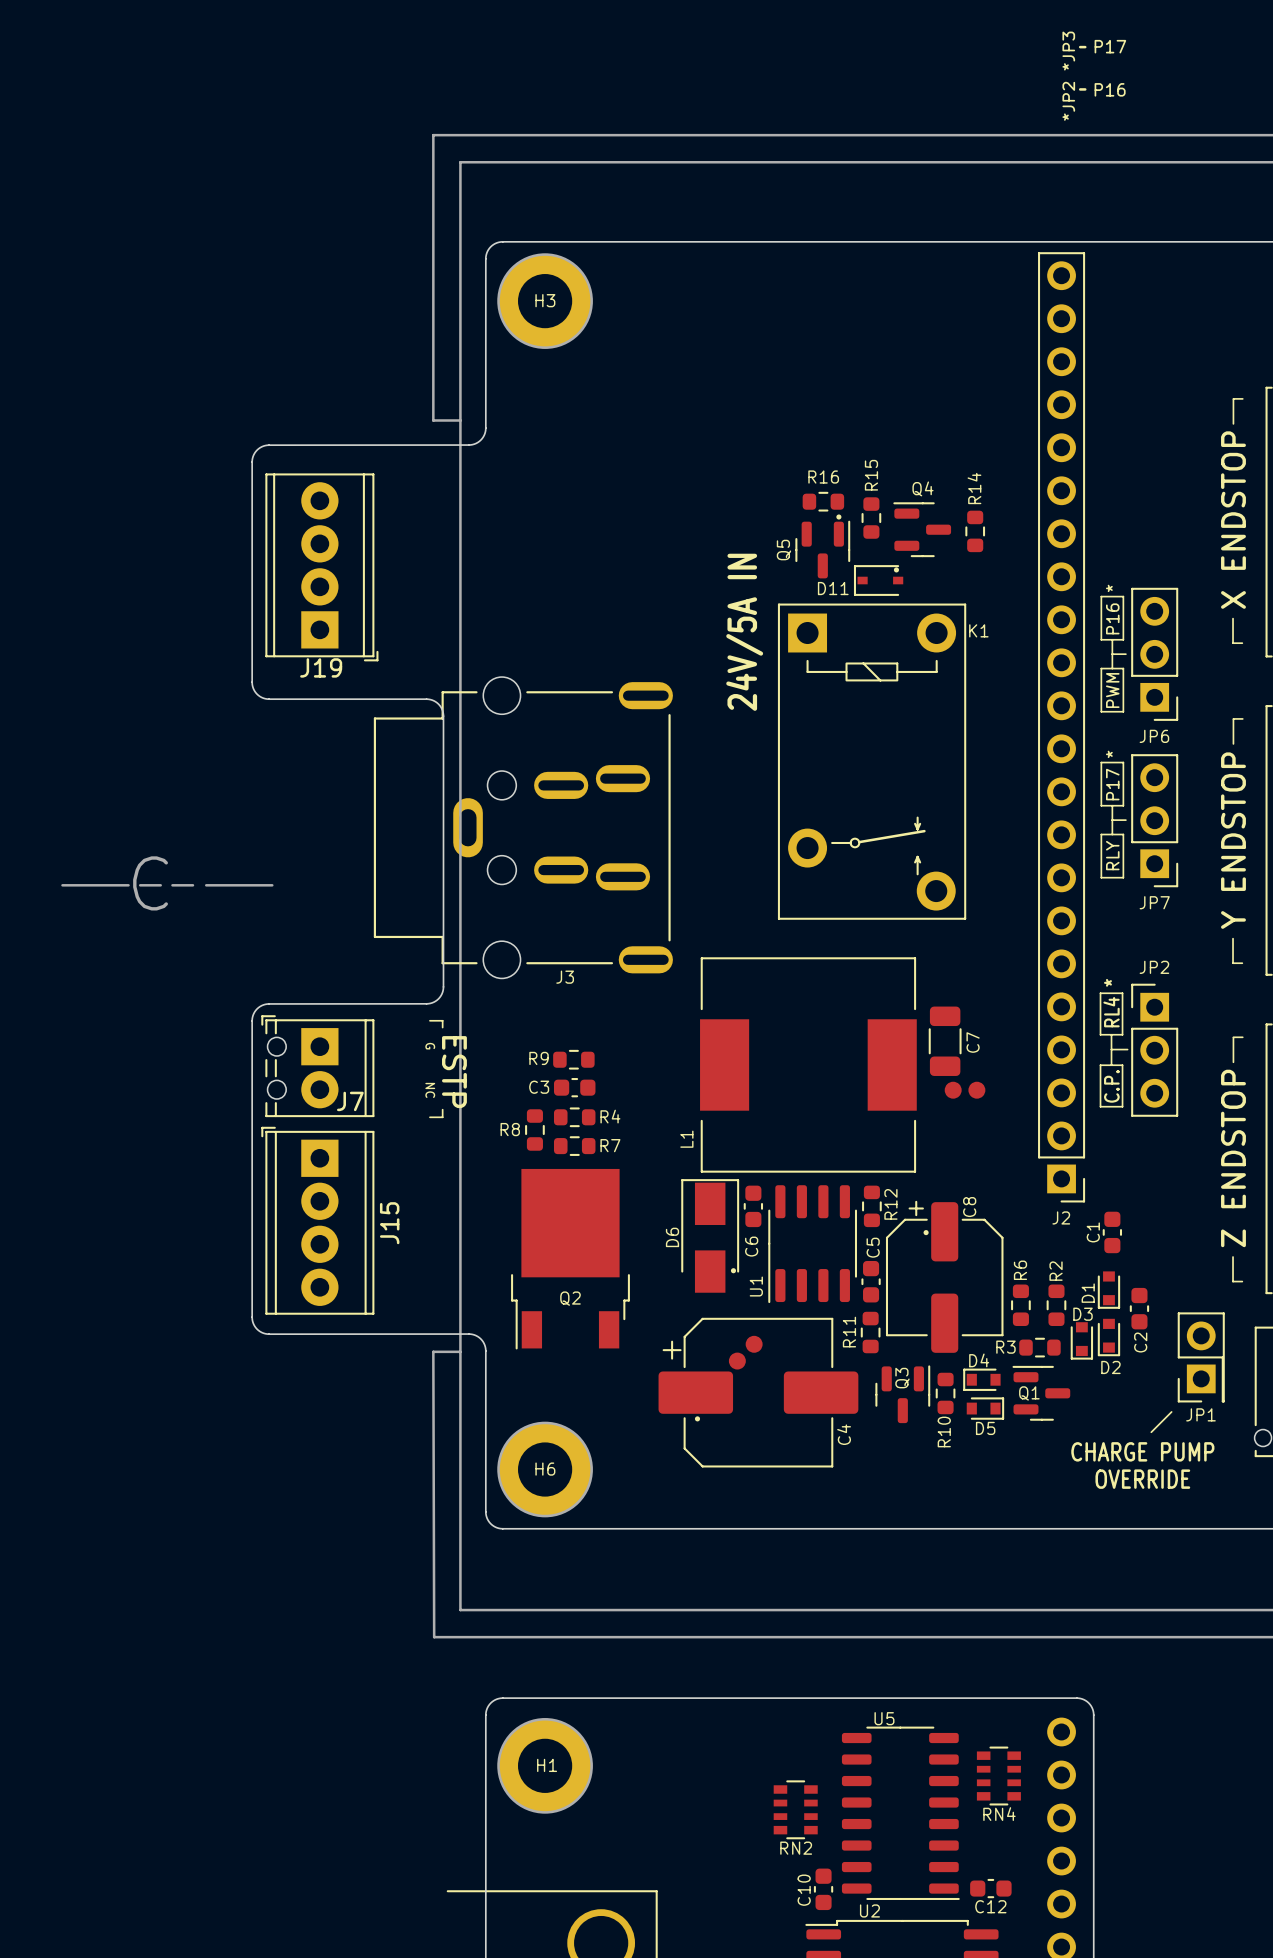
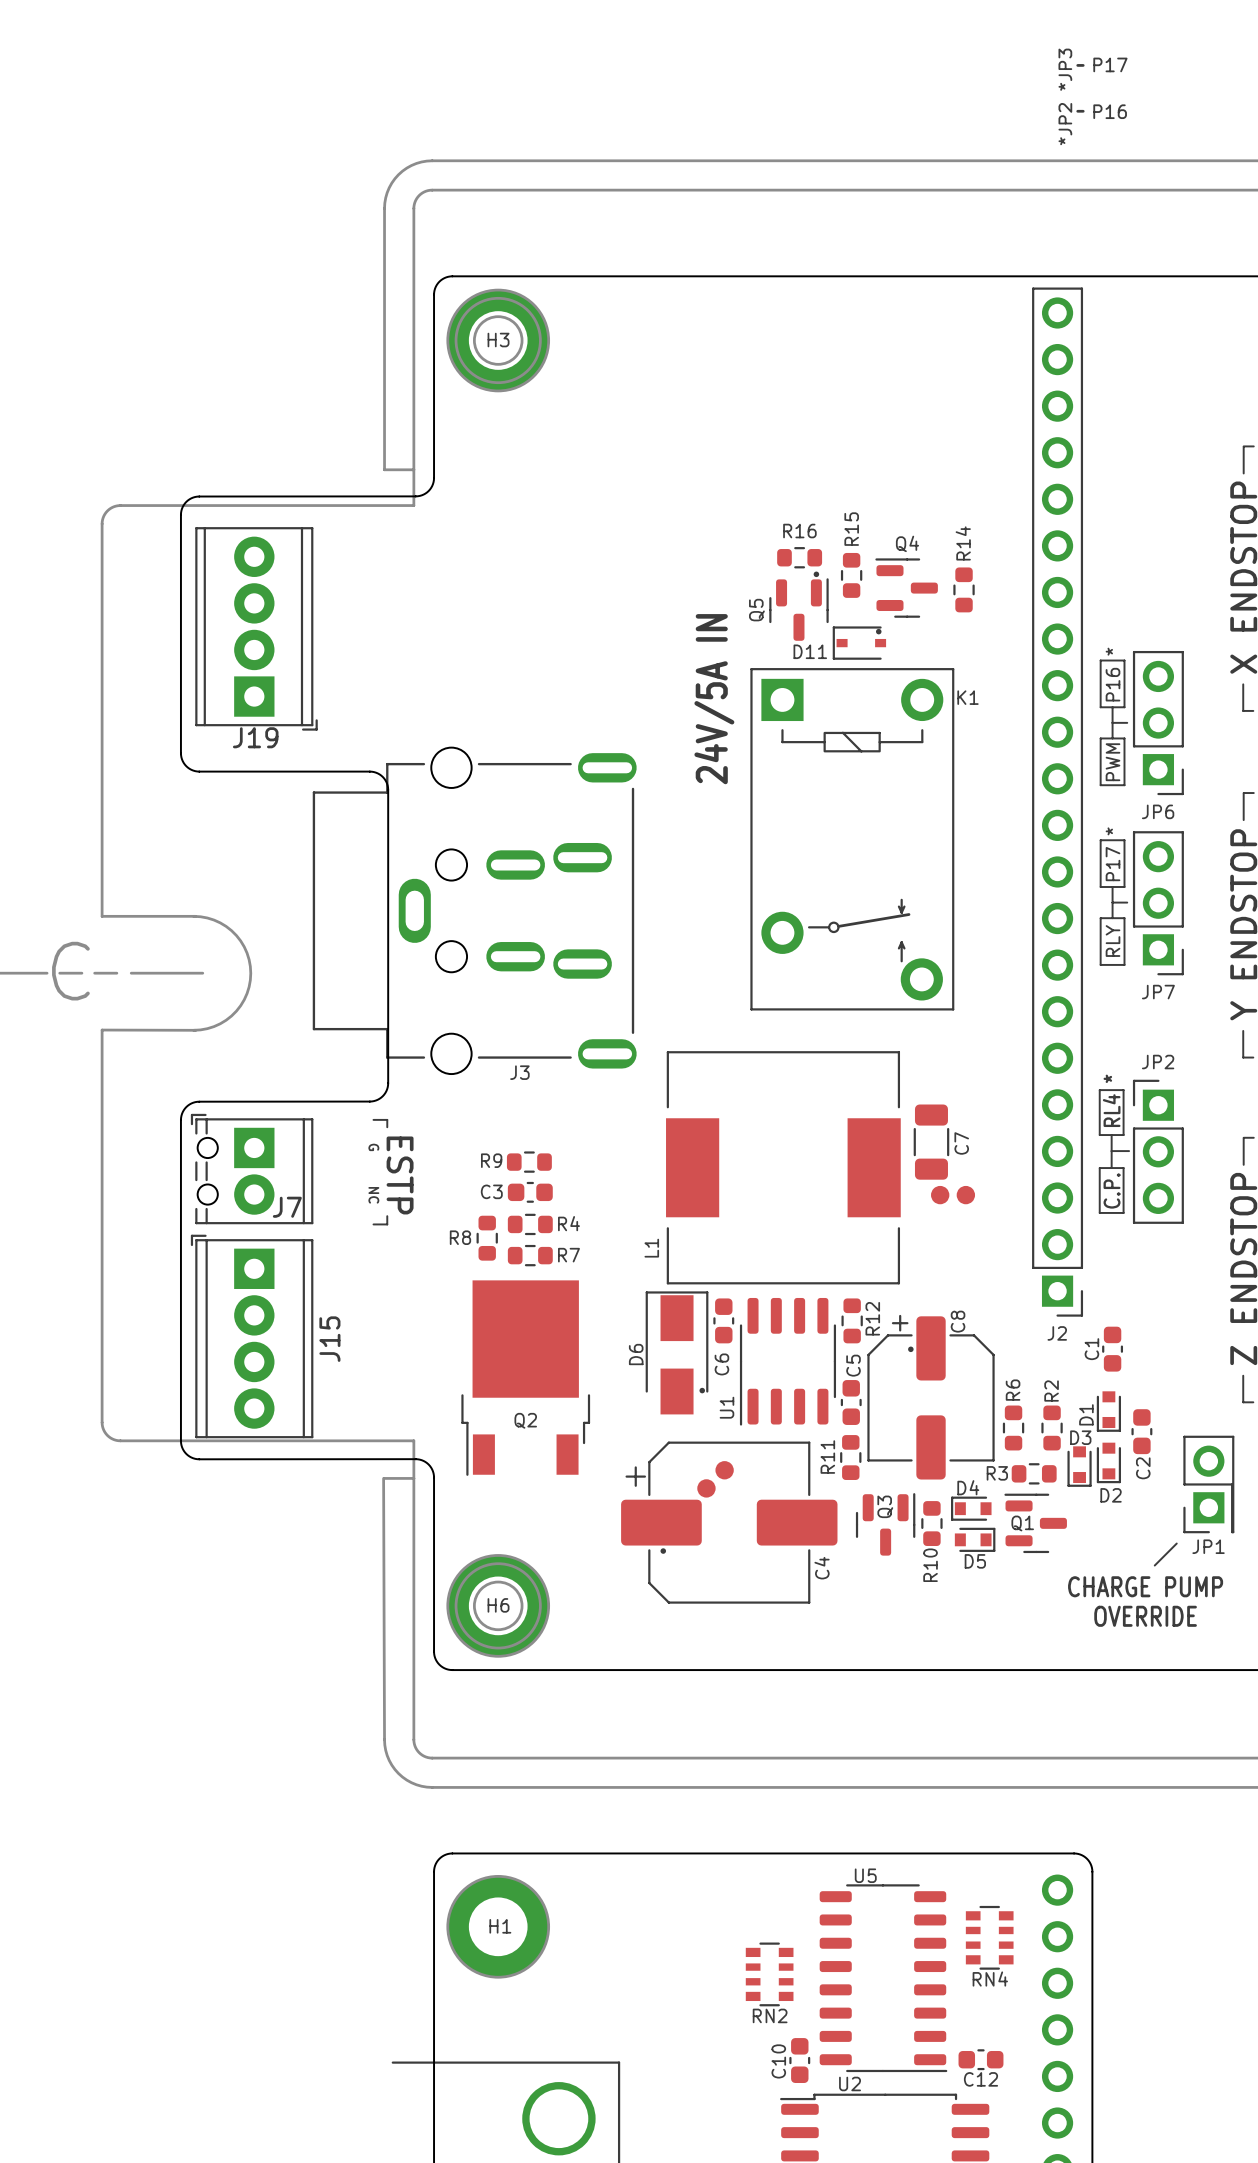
line: (484, 135) (433, 135) (433, 420) (440, 420) -> (432, 160) (416, 163) (402, 171) (391, 183) (384, 203) (384, 469)
line: (484, 162) (460, 162) (460, 1610) (484, 1610) -> (195, 1030) (102, 1030) (103, 1428) (109, 1436) (120, 1440) (413, 1440) (413, 1741) (419, 1752) (432, 1758)
line: none -> (432, 190) (420, 194) (413, 206) (413, 505) (120, 505) (109, 509) (103, 517) (102, 916) (195, 916)
drawing: none -> [454, 296, 542, 385]
line: none -> (406, 469) (413, 469)
line: none -> (193, 916) (207, 918) (220, 922) (236, 935) (247, 953) (250, 973) (247, 993) (236, 1011) (220, 1023) (207, 1028) (193, 1030)
line: (440, 1351) (433, 1351) (434, 1637) (484, 1637) -> (383, 1478) (384, 1745) (389, 1760) (402, 1777) (416, 1784) (432, 1787)
line: none -> (406, 1478) (413, 1478)
drawing: none -> [454, 1562, 542, 1650]

